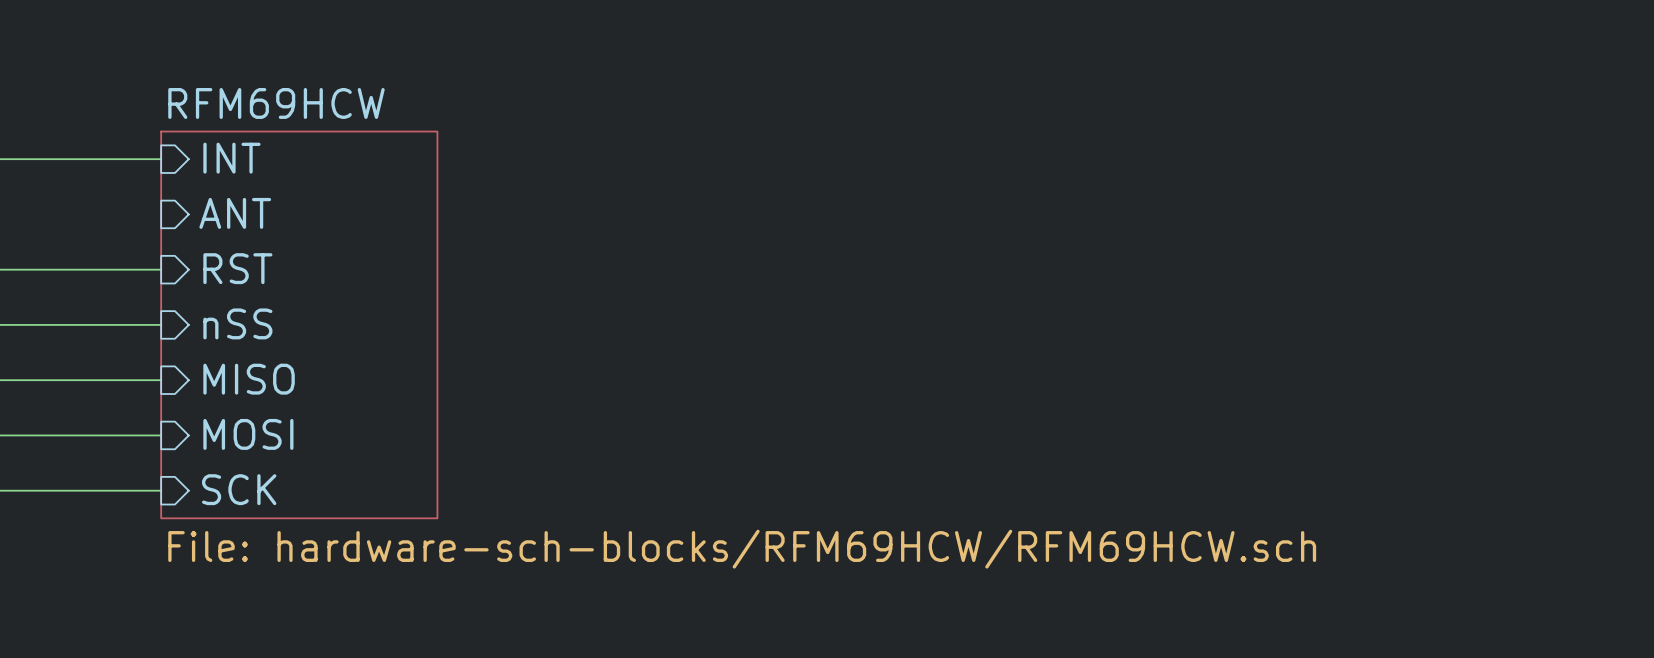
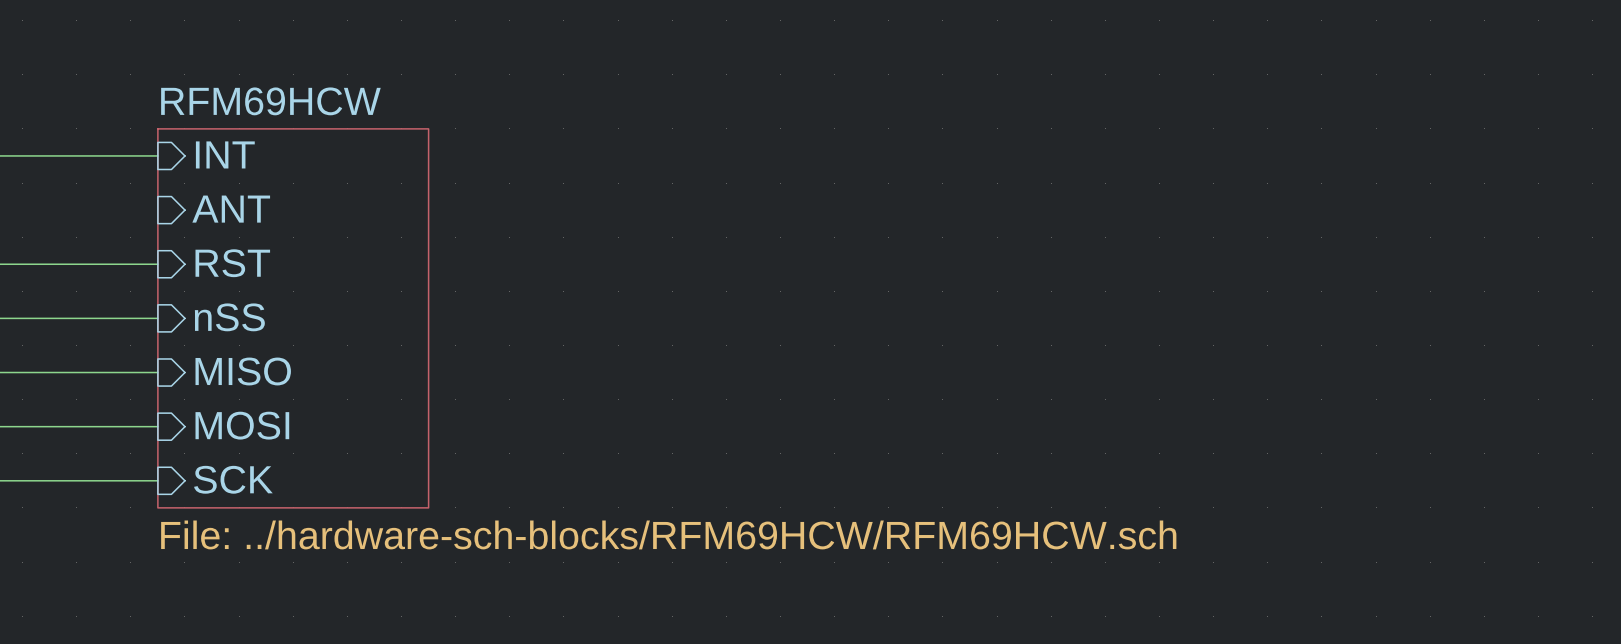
sheet RFM69HCW value: File: hardware-sch-blocks/RFM69HCW/RFM69HCW.sch (742, 549) -> File: ../hardware-sch-blocks/RFM69HCW/RFM69HCW.sch (668, 534)

